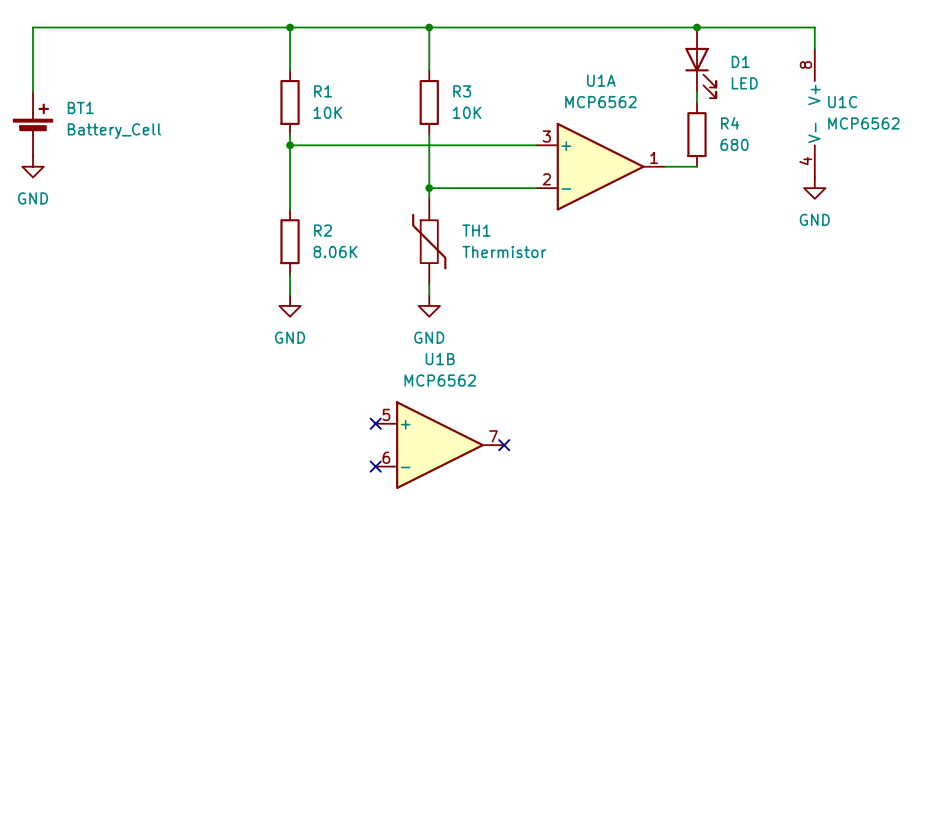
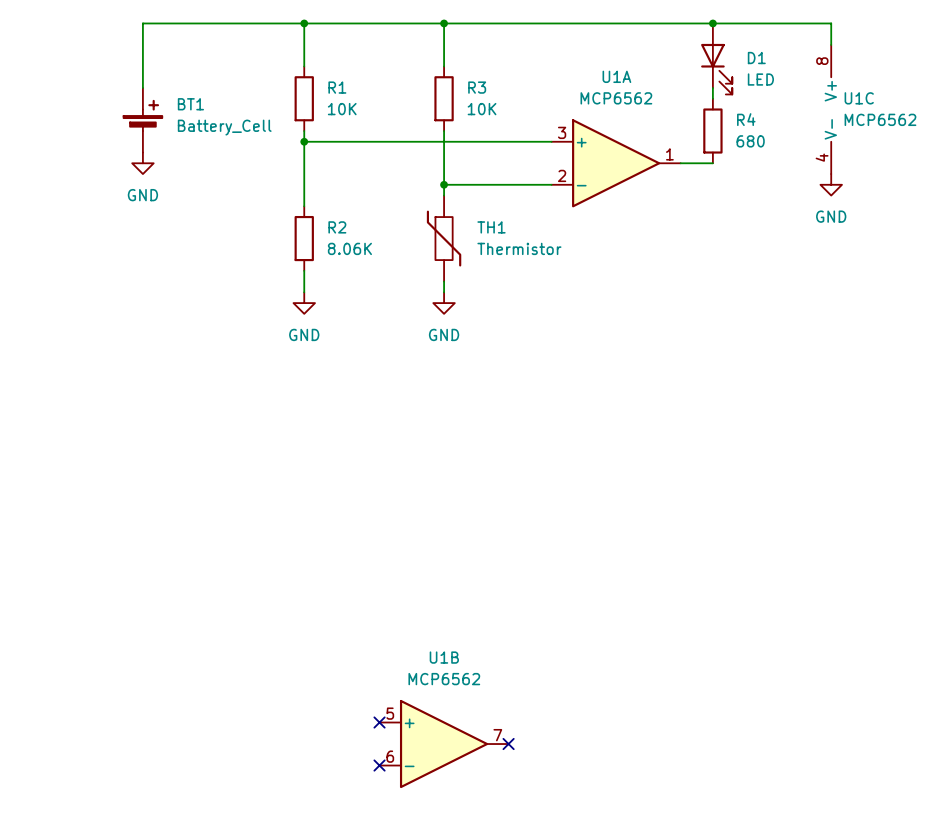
wire: (129, 27) (33, 27) (33, 91) -> (142, 23) (142, 87)
BT1 position: (33, 123) -> (142, 120)
power symbol position: GND (33, 166) -> GND (142, 163)
no-connect mark: (375, 423) -> none
U1B position: (439, 445) -> (444, 744)
no-connect mark: (504, 445) -> none
no-connect mark: (375, 466) -> none
no-connect mark: none -> (379, 722)
no-connect mark: none -> (508, 744)
no-connect mark: none -> (379, 765)

